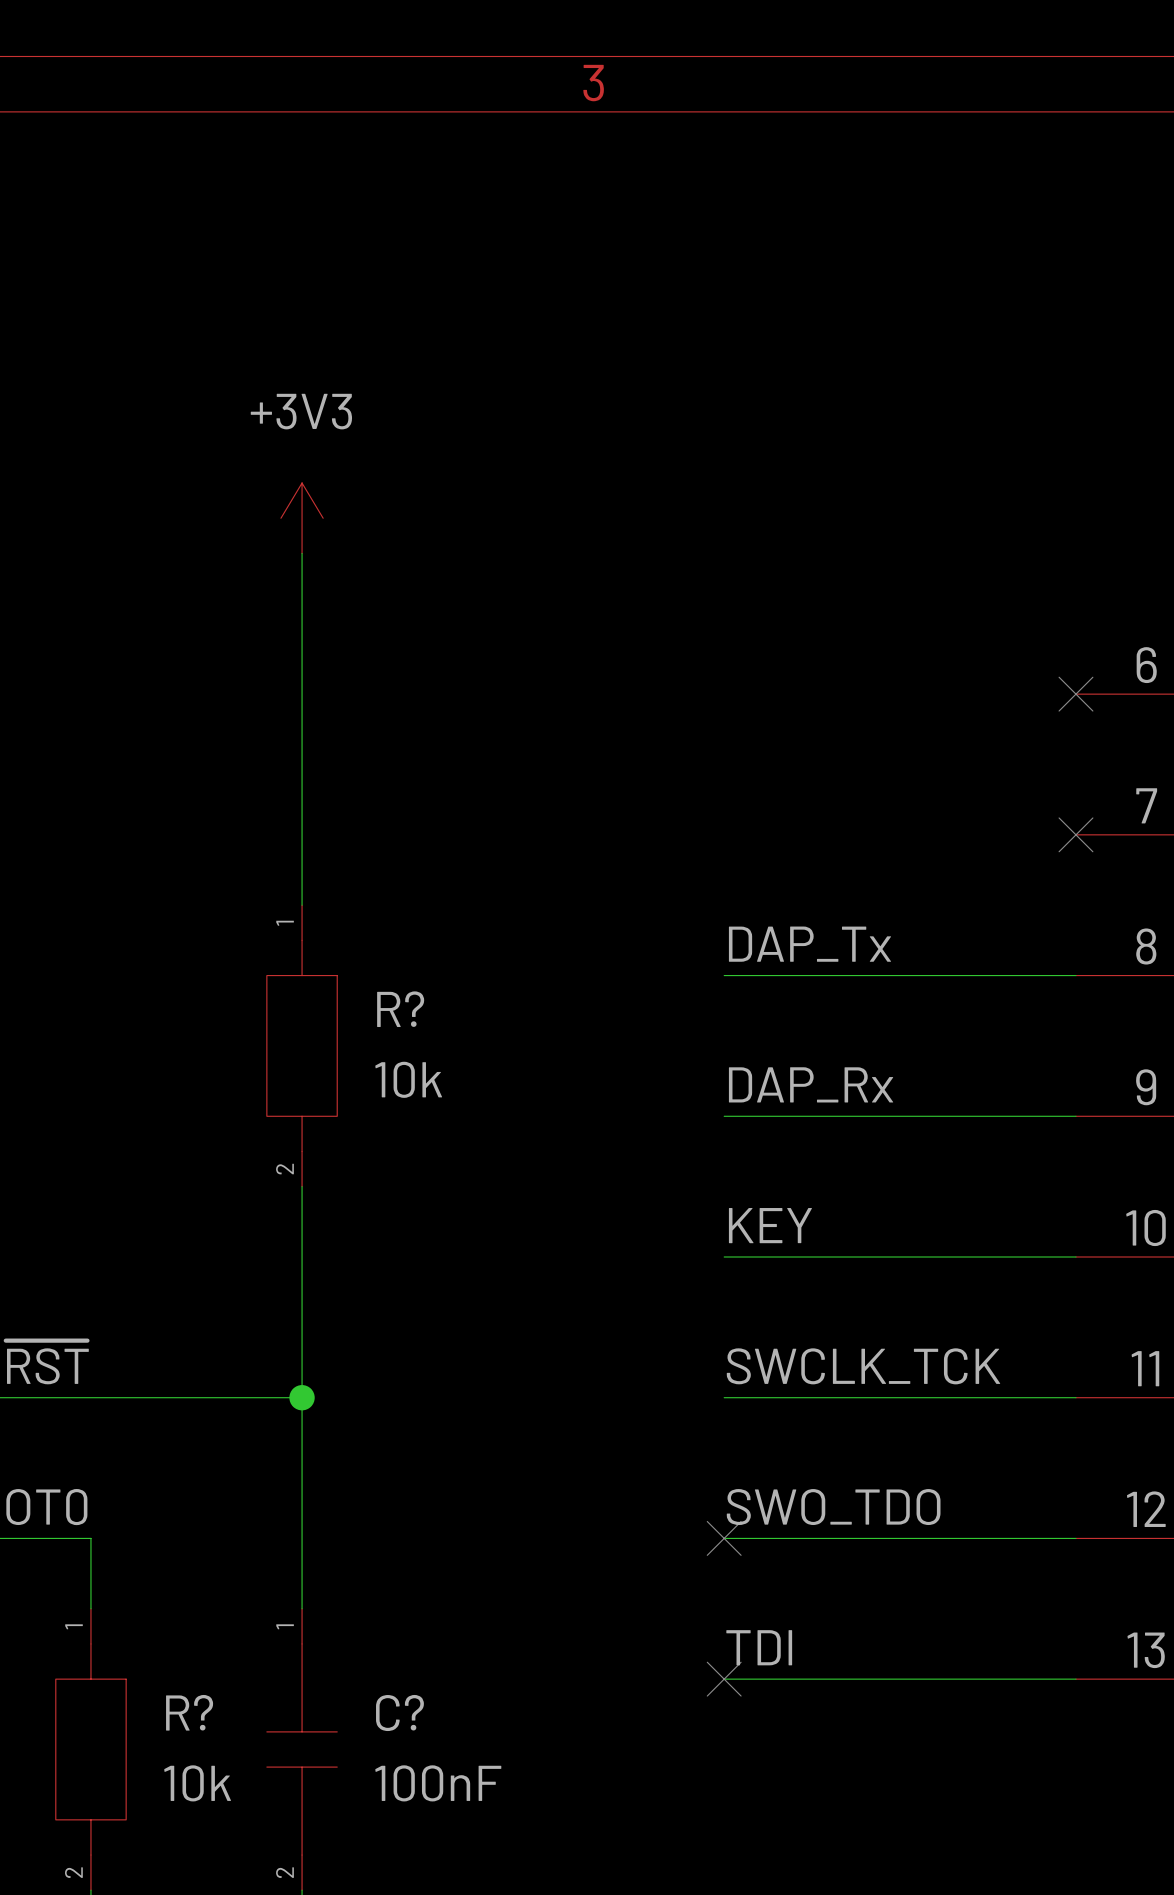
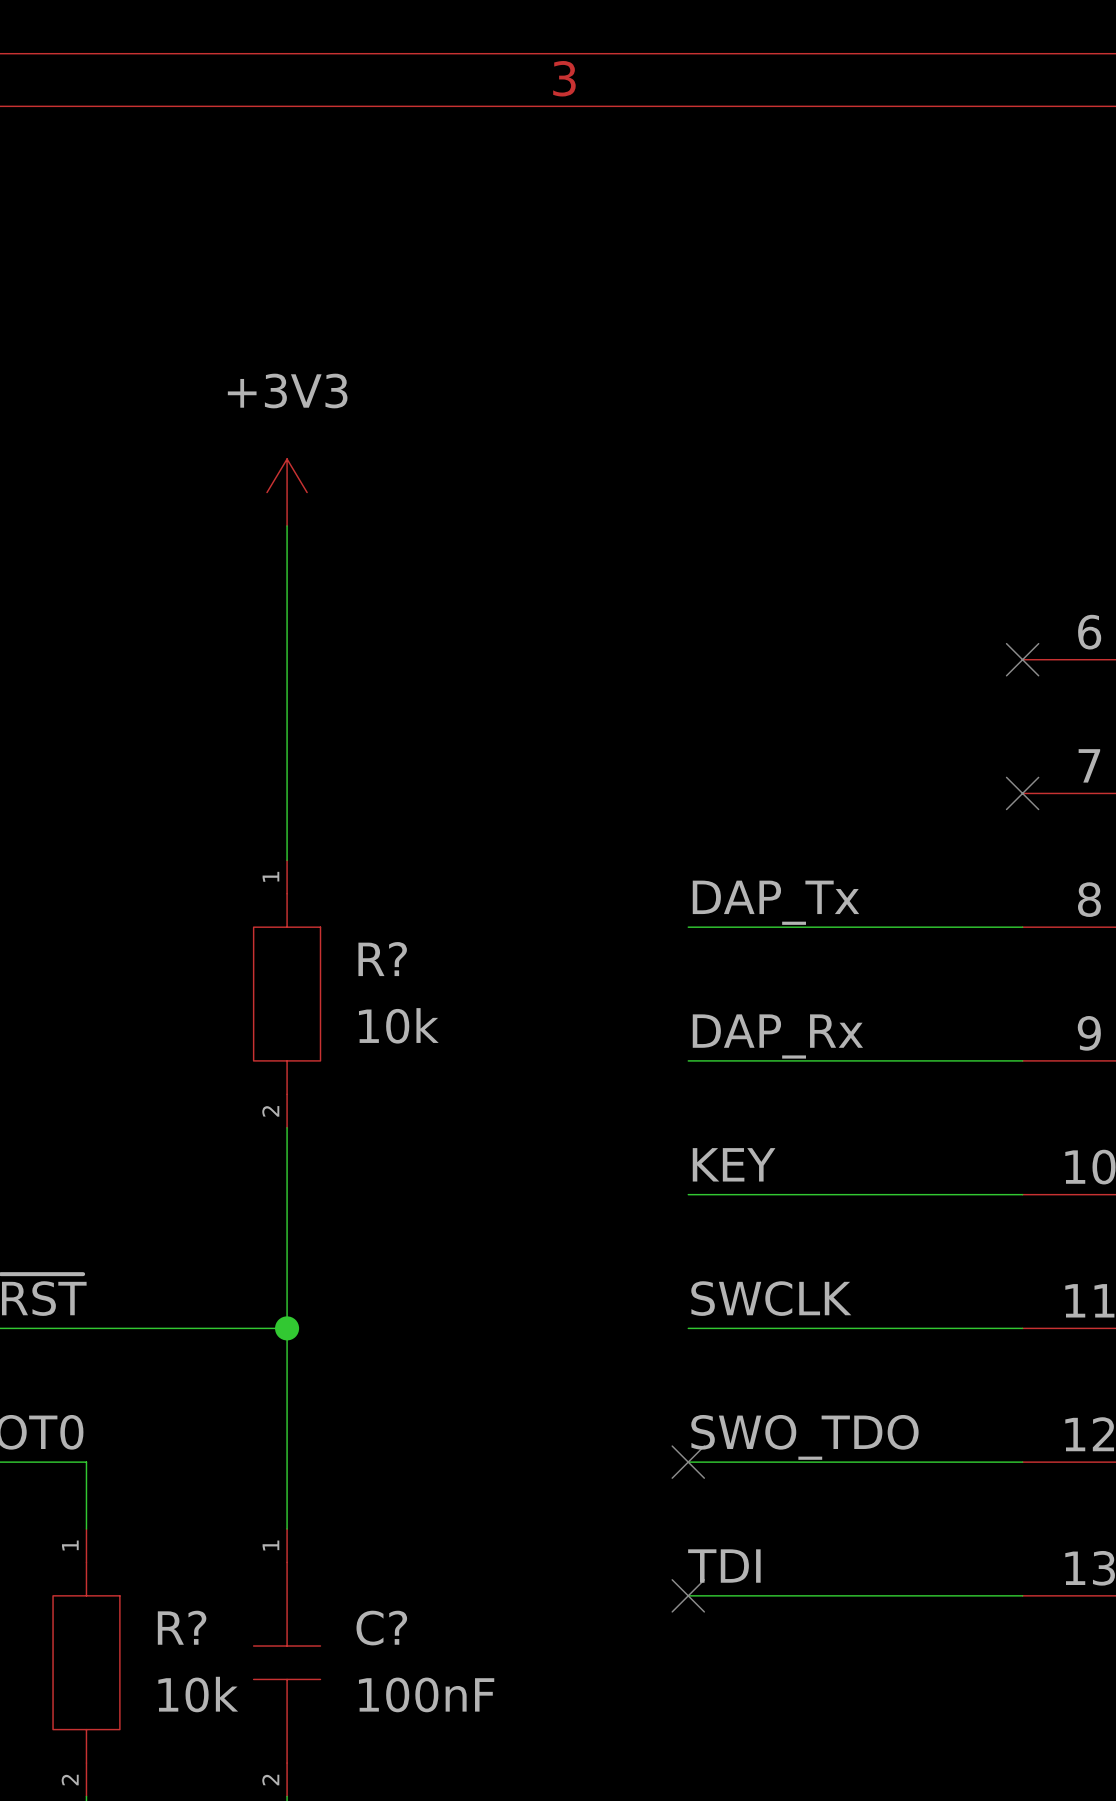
label: SWCLK_TCK (863, 1366) -> SWCLK (771, 1298)

